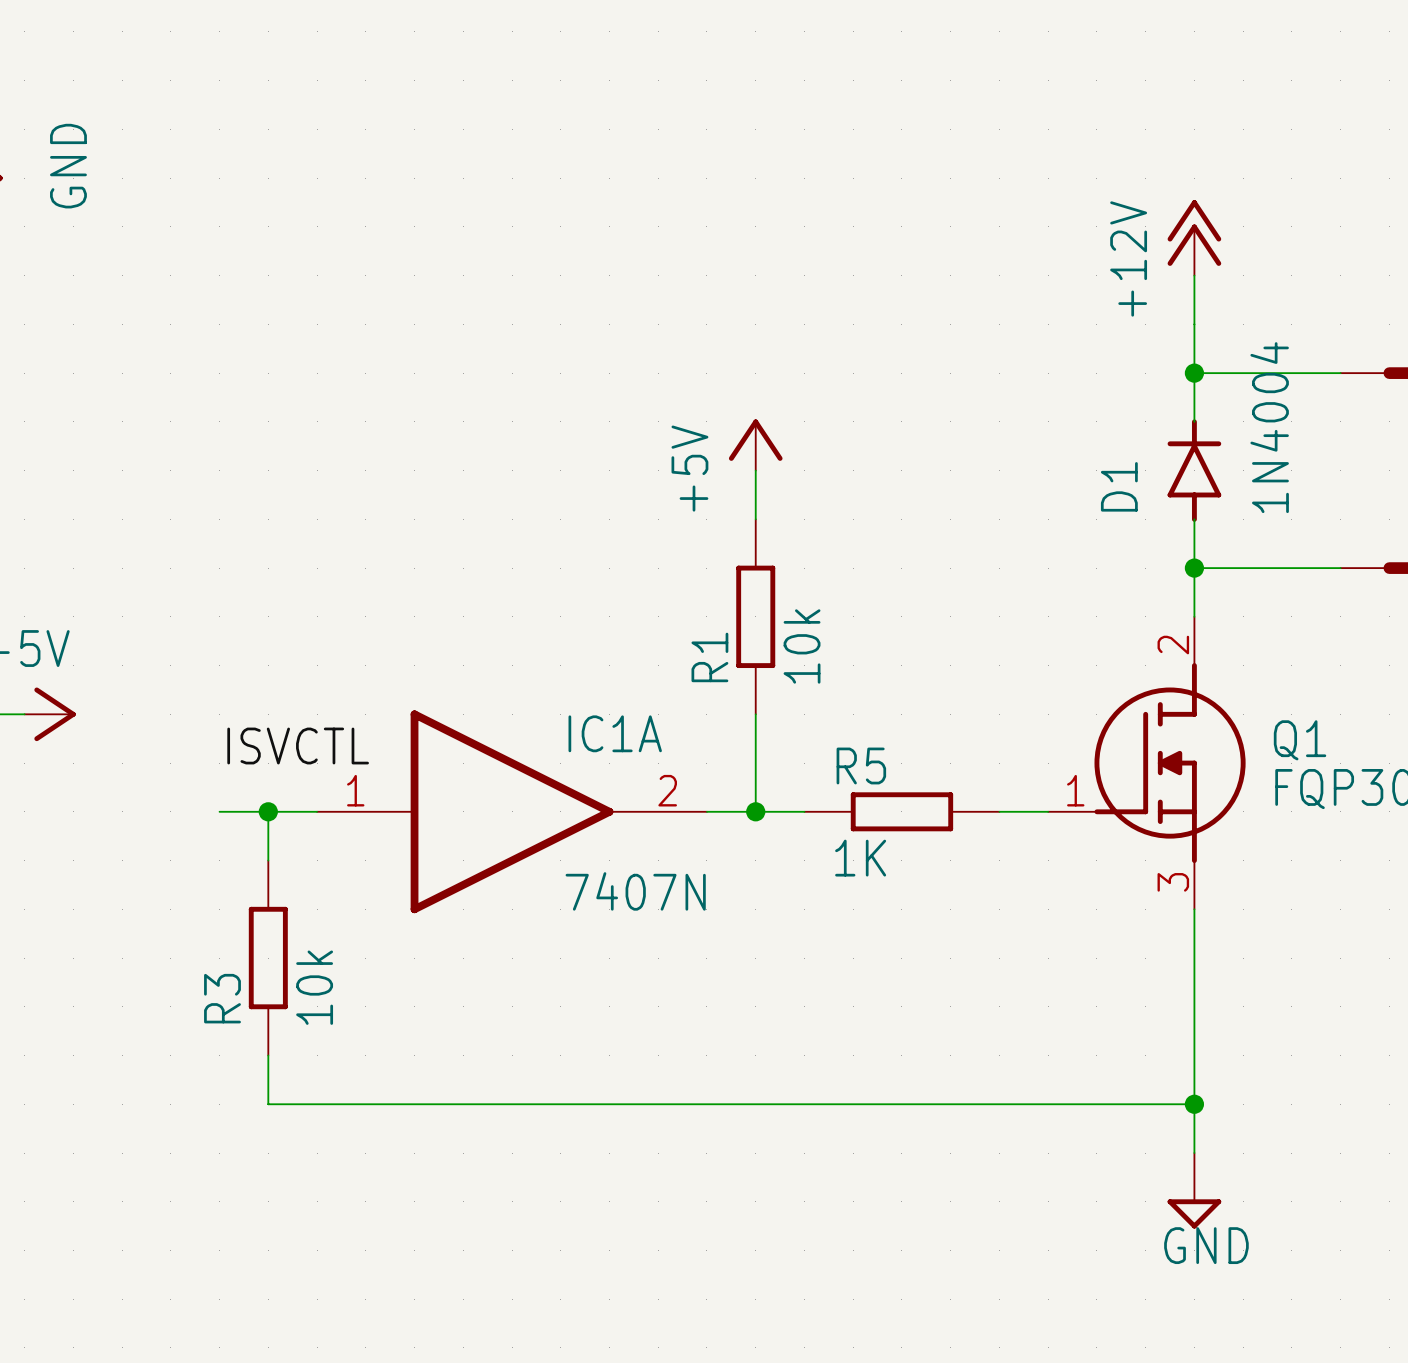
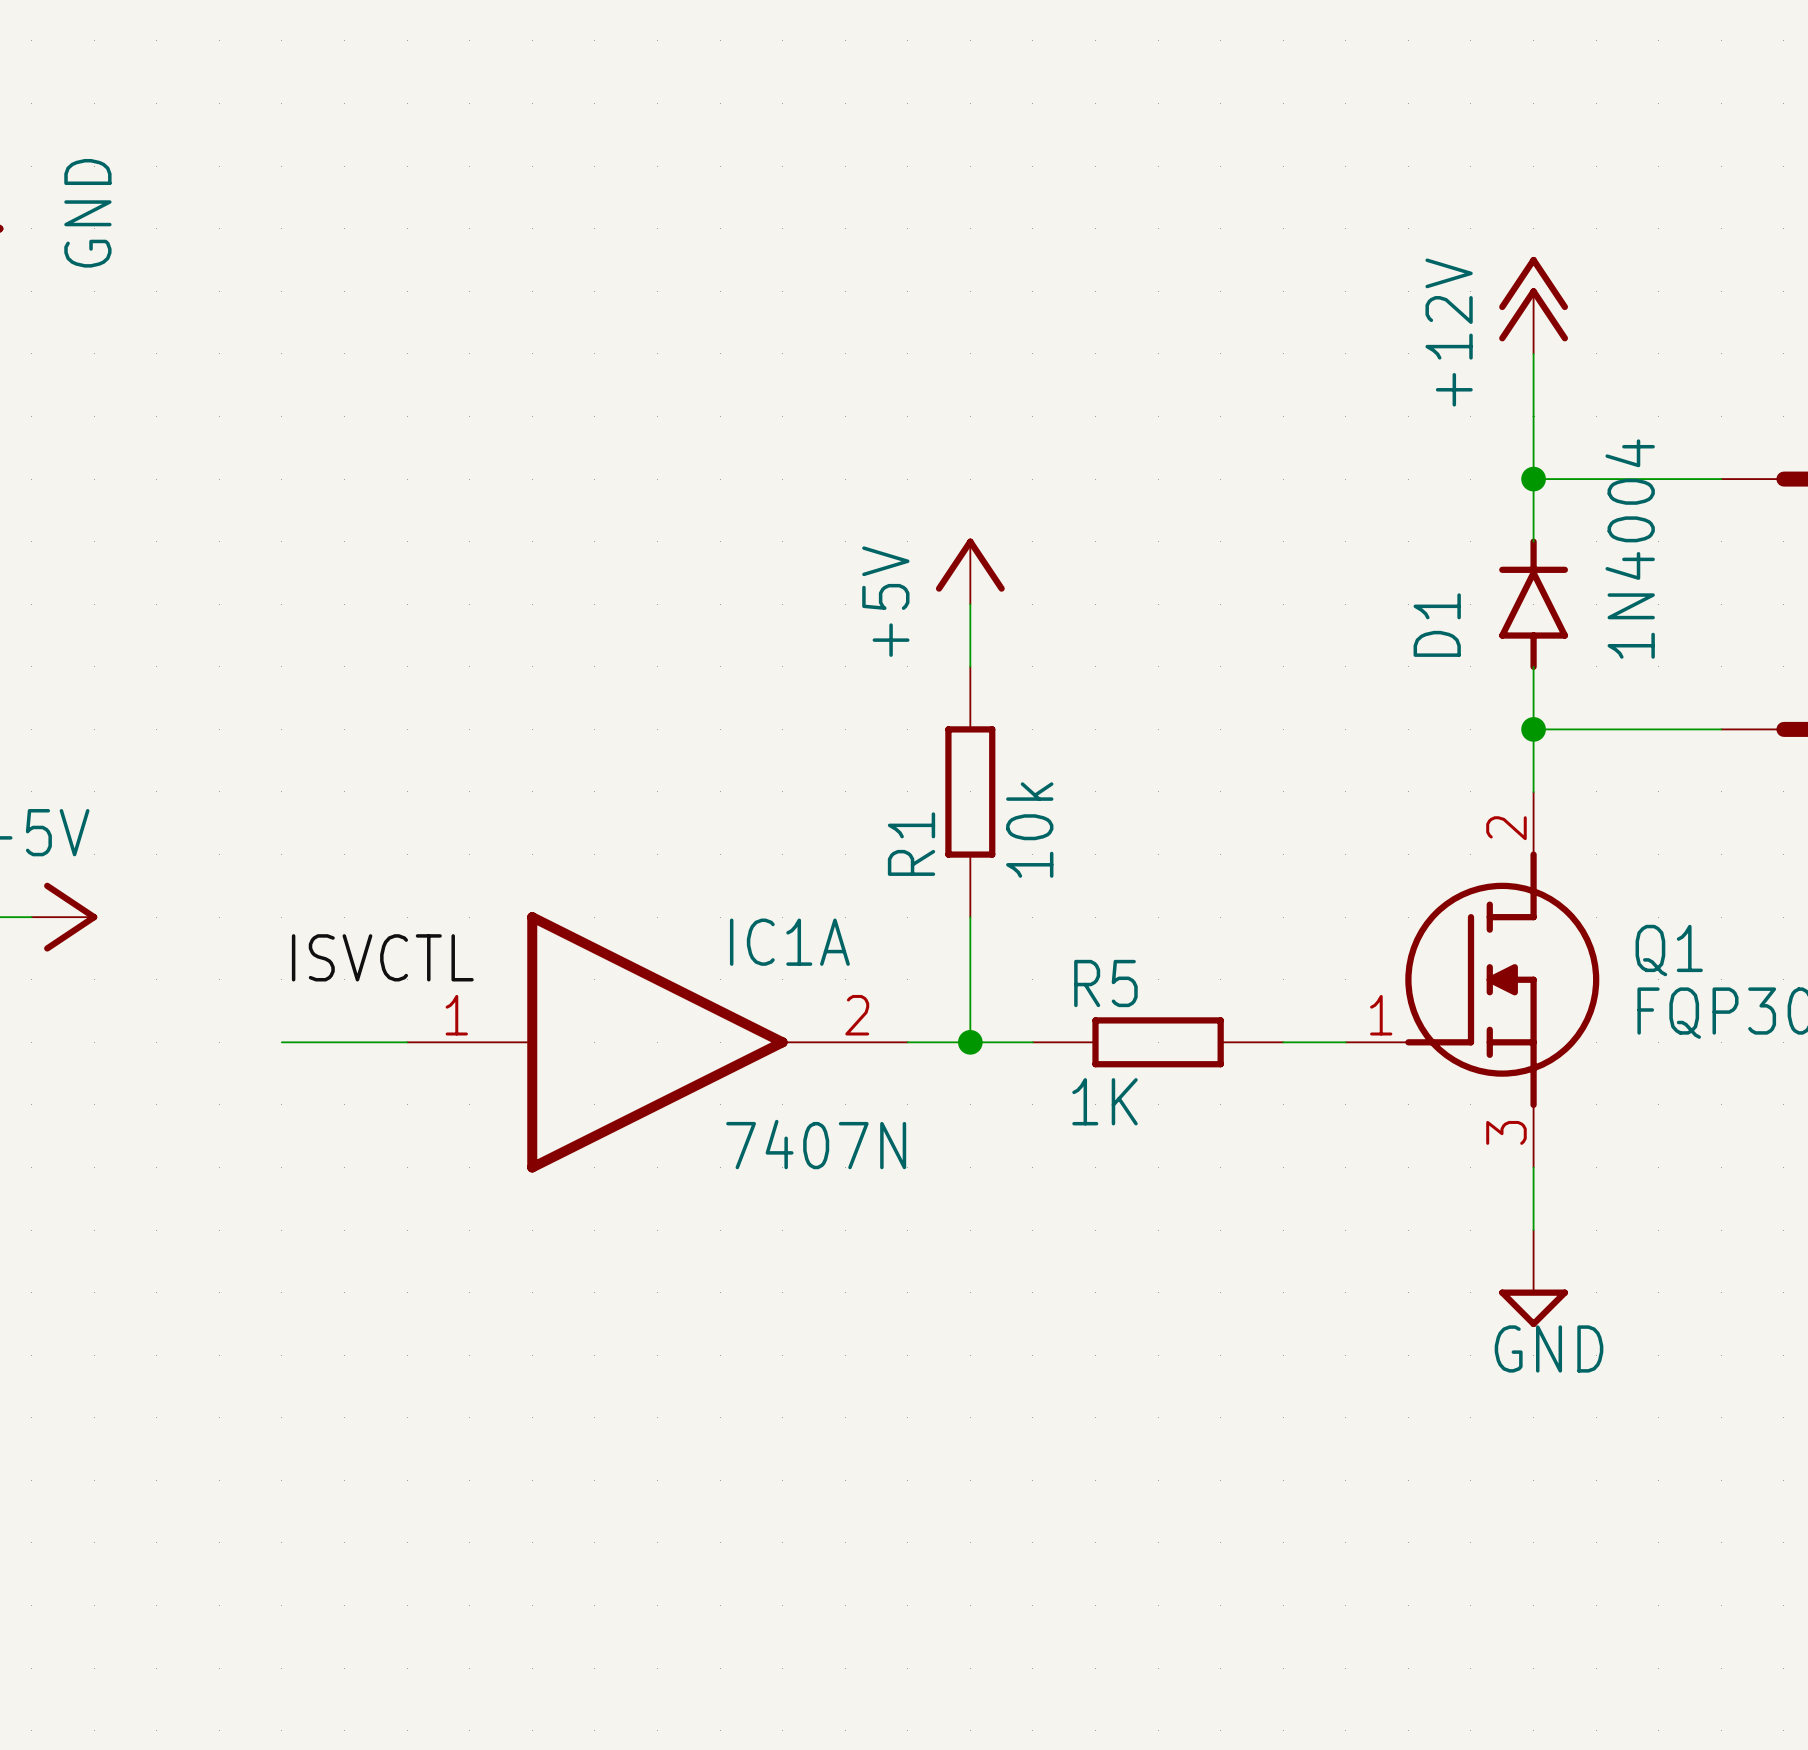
wire: (268, 811) (268, 860) -> none
junction: (268, 811) -> none
R3: 10k (268, 958) -> none
wire: (1194, 958) (1194, 1153) -> none
wire: (268, 1055) (268, 1104) (1194, 1104) -> none
junction: (1194, 1104) -> none
power symbol position: GND (1194, 1190) -> GND (1533, 1278)

